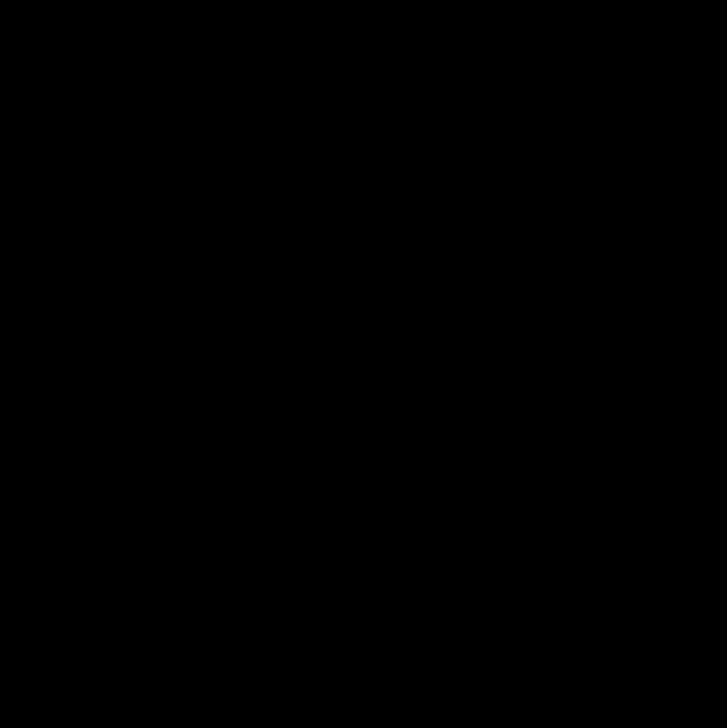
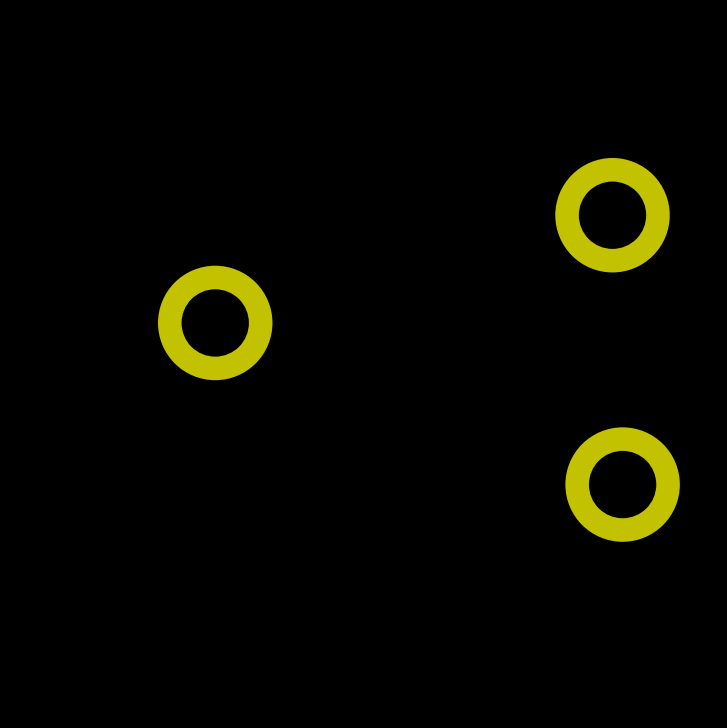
part: none -> (612, 215)
part: none -> (215, 322)
part: none -> (622, 484)

